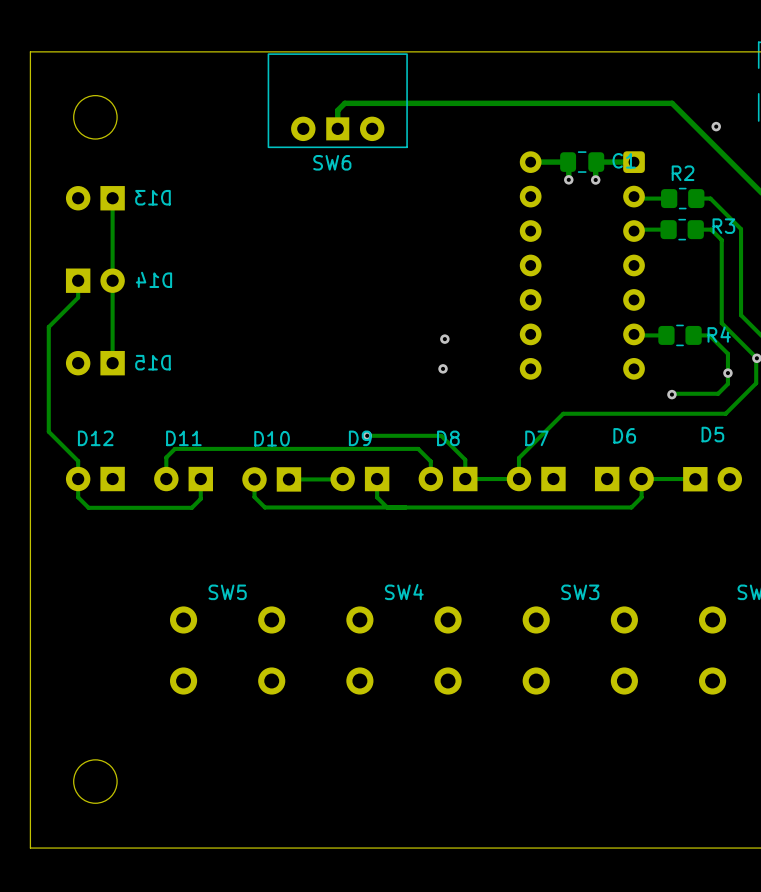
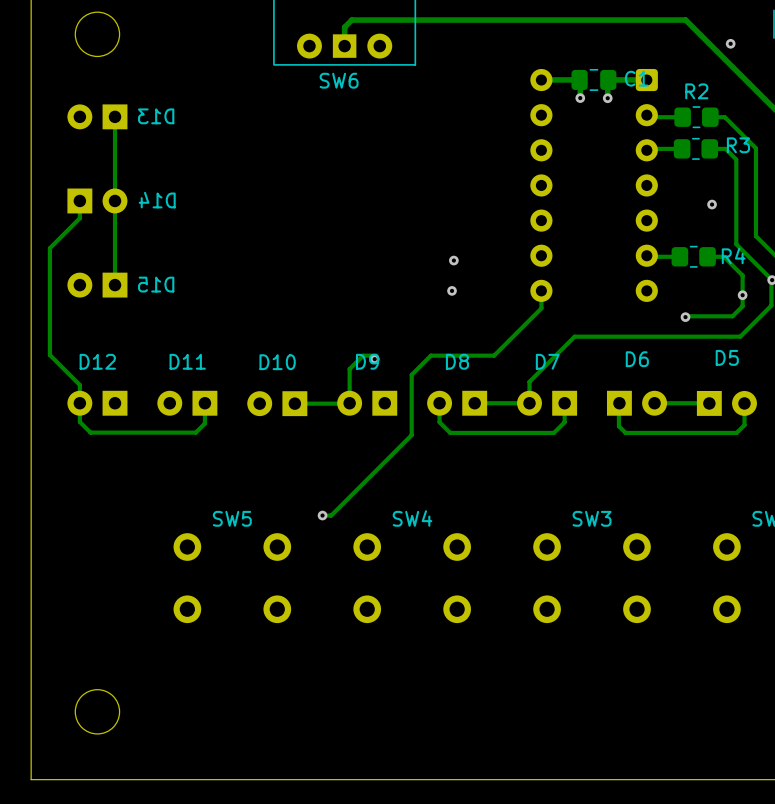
via: none -> (712, 204)
track: none -> (541, 290) (541, 308) (494, 355) (430, 355) (411, 374) (411, 435) (331, 515) (322, 515)
track: none -> (376, 355) (363, 355) (349, 369) (349, 403)
track: (367, 435) (441, 435) (465, 459) (465, 479) -> none
track: (377, 479) (377, 497) (387, 507) -> none
track: (430, 479) (430, 461) (418, 448) (174, 448) (166, 457) (166, 479) -> (439, 403) (439, 422) (450, 432) (553, 432) (564, 422) (564, 403)
track: (641, 479) (641, 497) (631, 507) (264, 507) (254, 497) (254, 479) -> none
track: none -> (744, 403) (744, 425) (736, 432) (625, 432) (618, 426) (618, 404)
via: none -> (322, 515)

